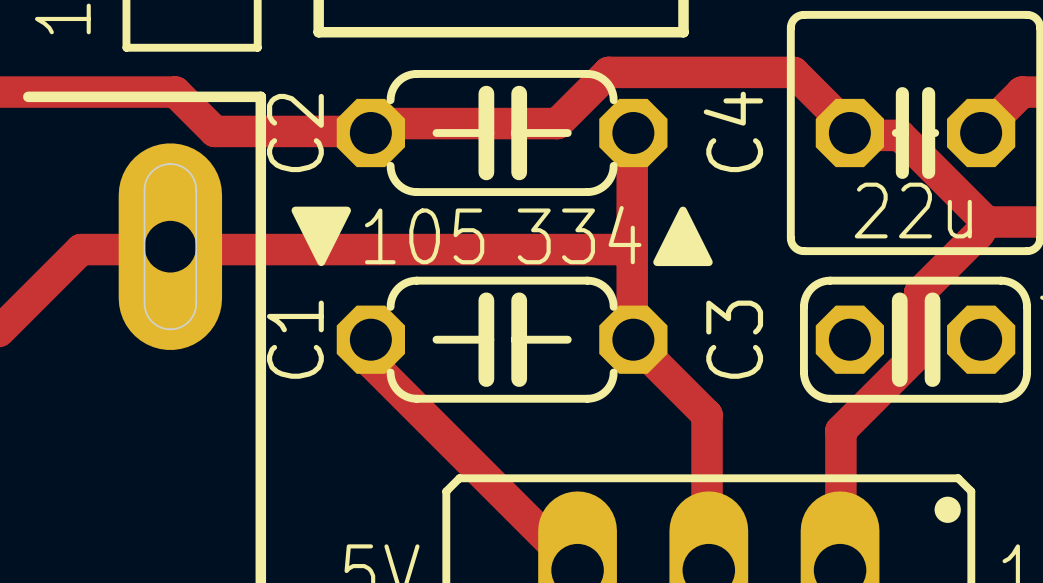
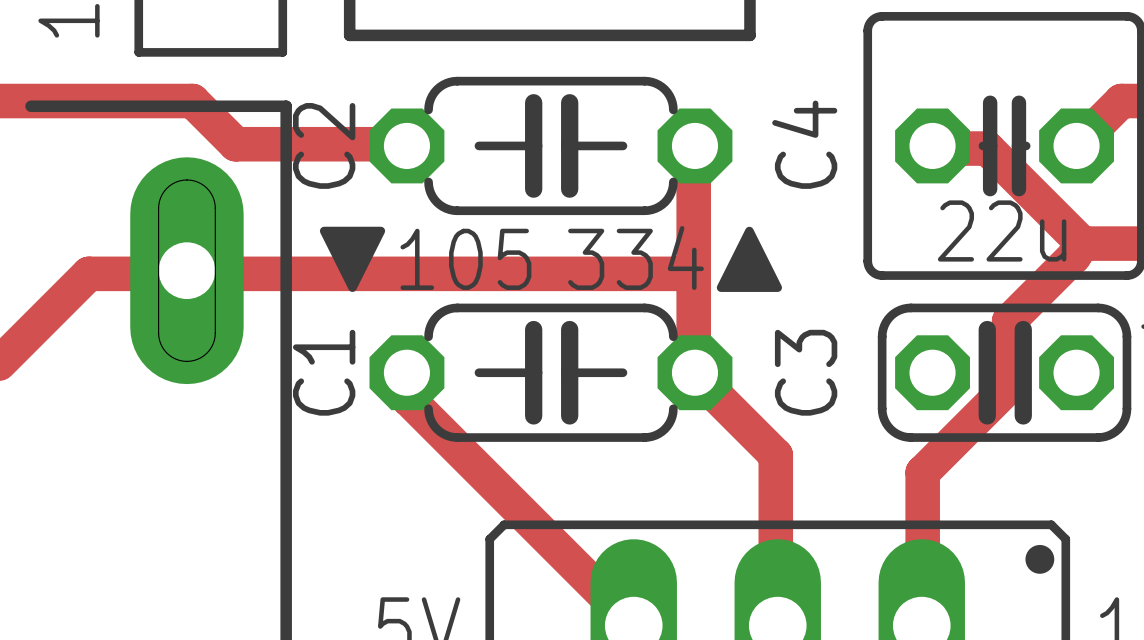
track: (370, 133) (384, 123) (557, 123) (608, 72) (793, 72) (840, 119) (849, 133) -> none

